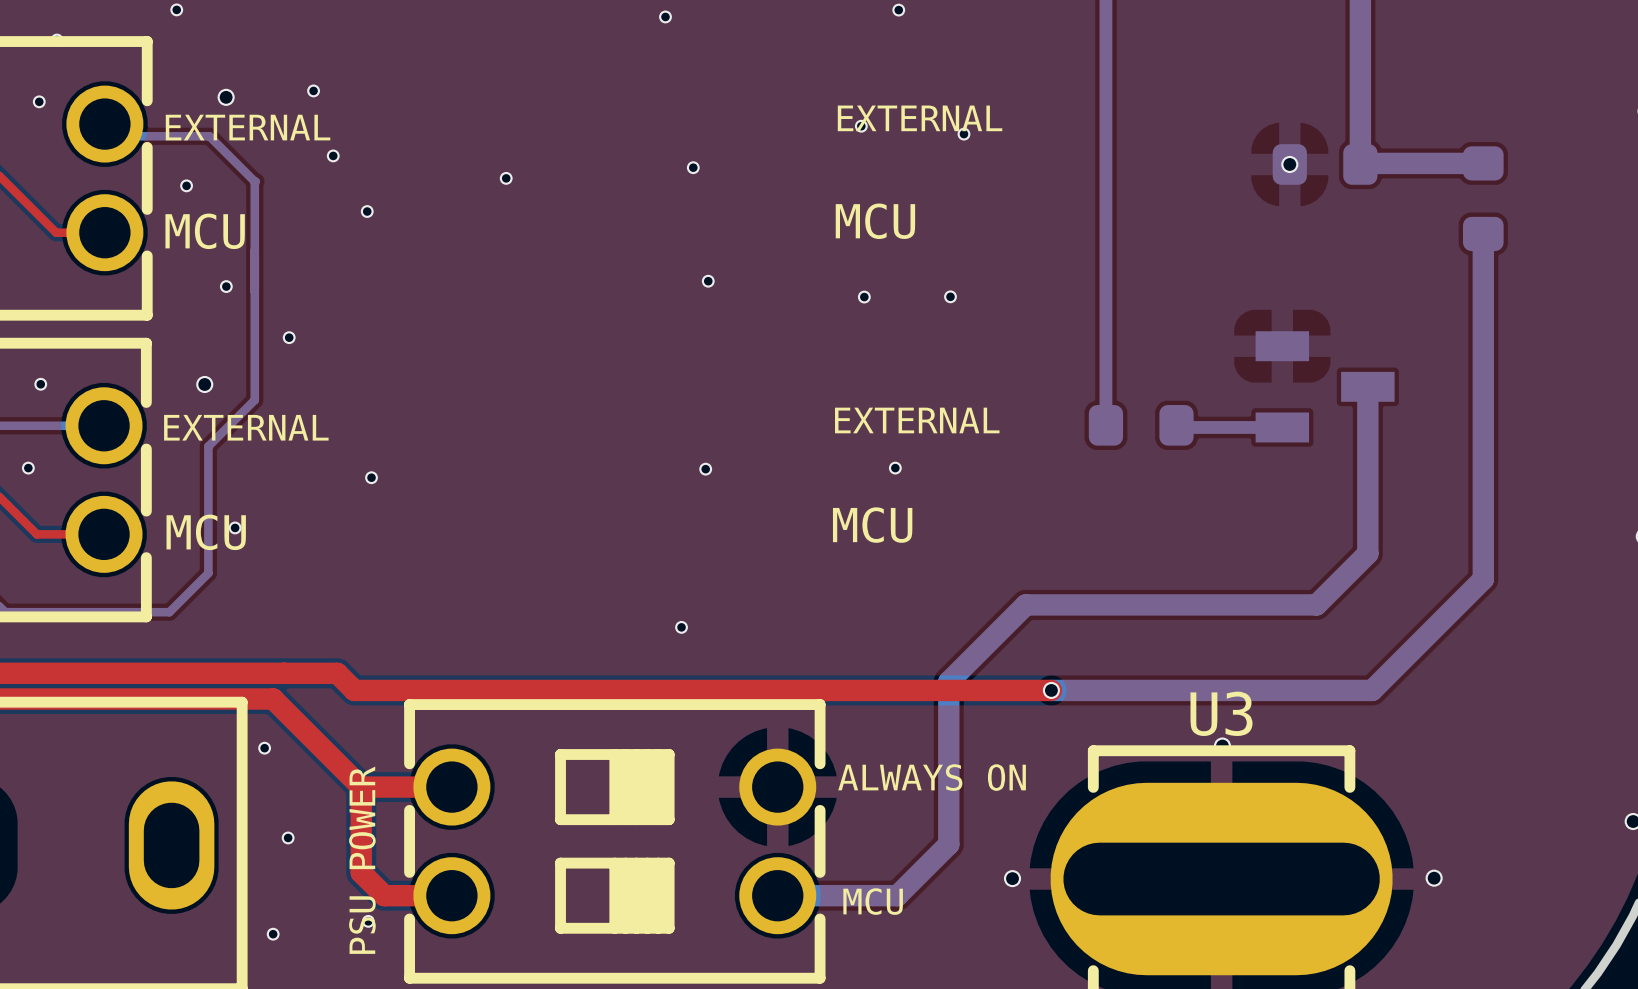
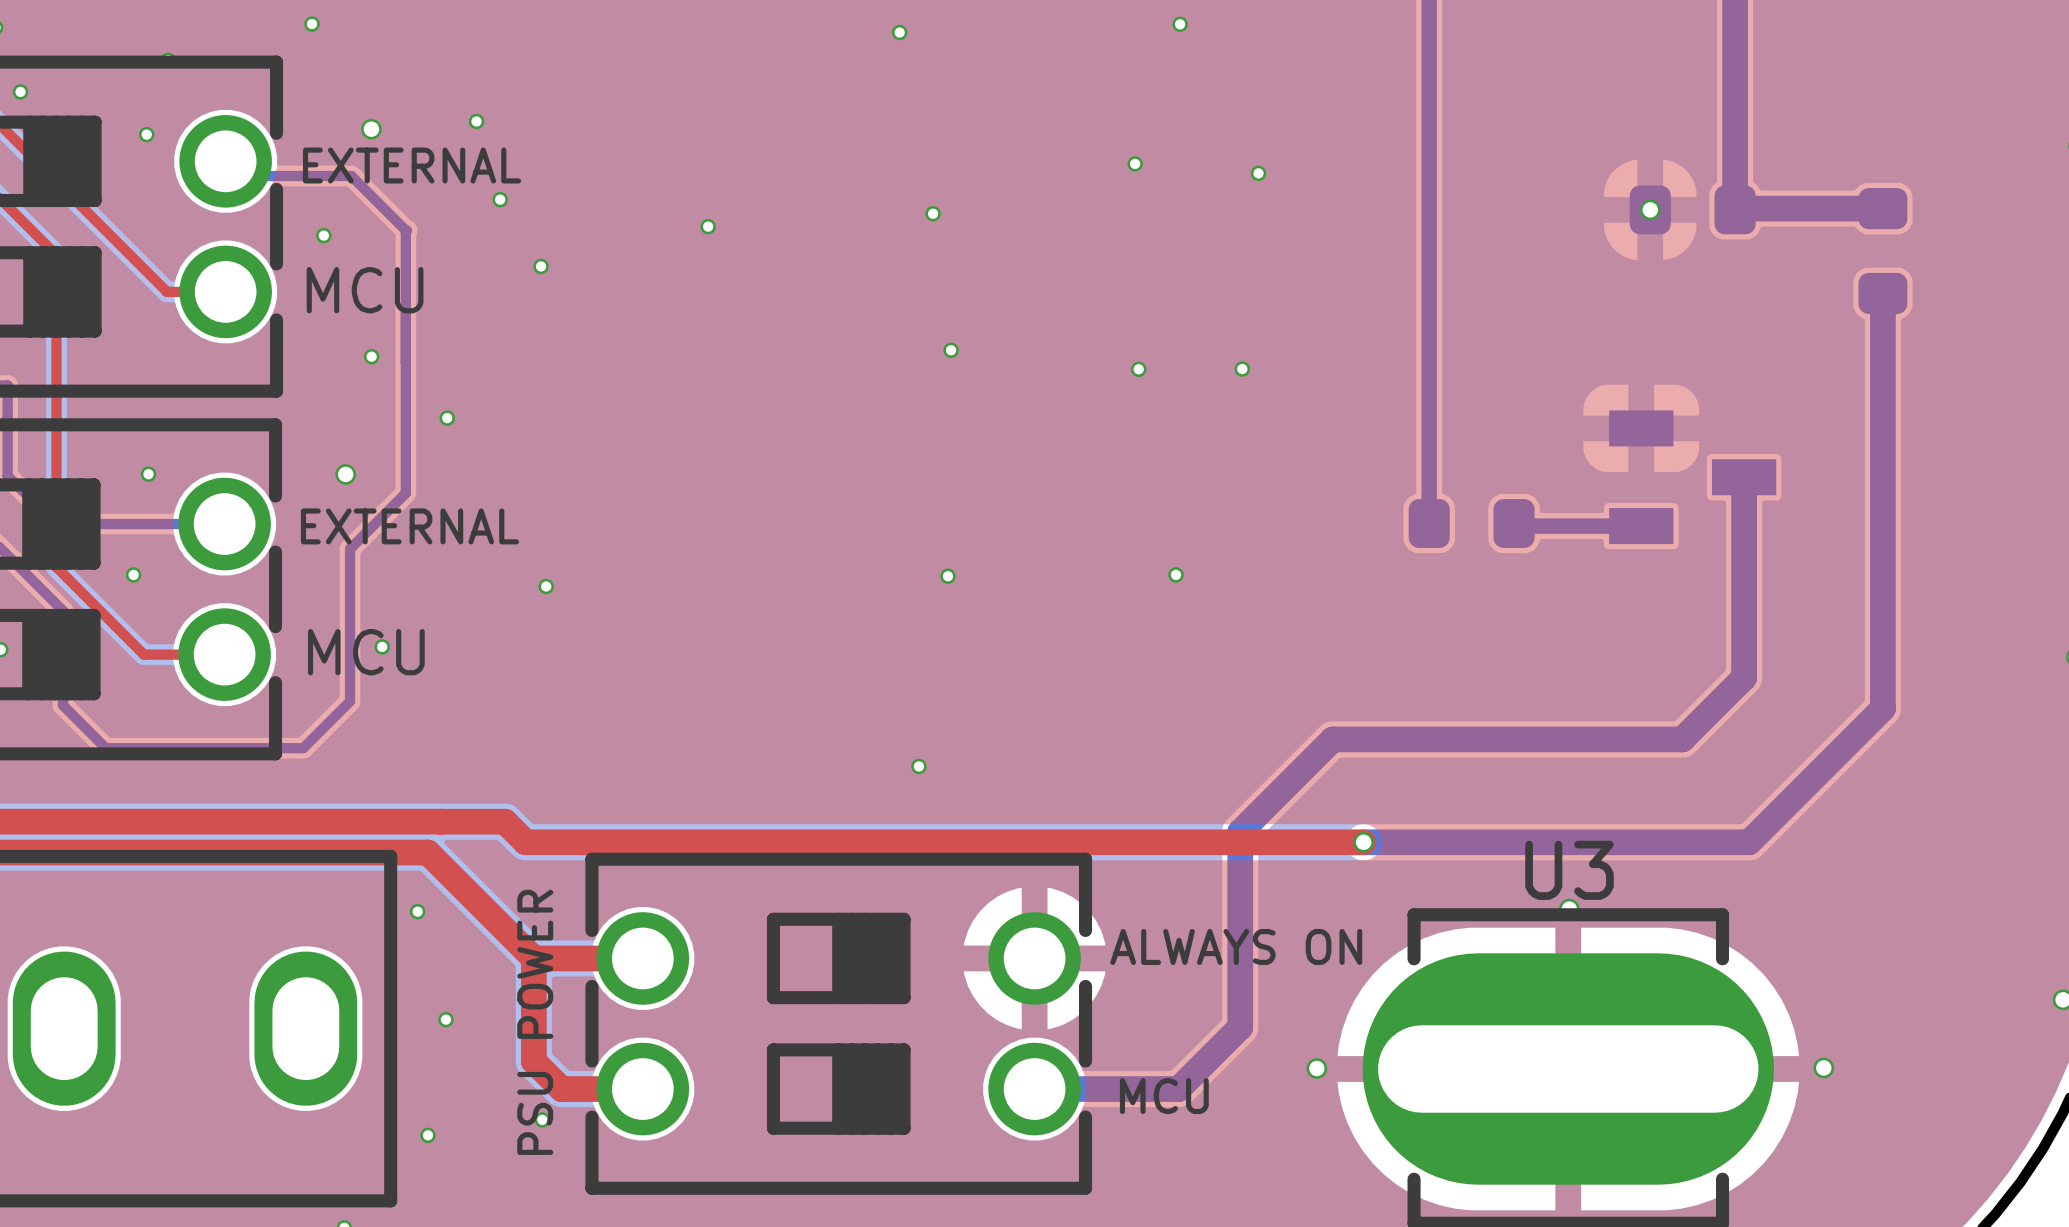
text: EXTERNAL (920, 118) -> none
text: MCU (875, 221) -> none
text: EXTERNAL (917, 420) -> none
text: MCU (872, 525) -> none

